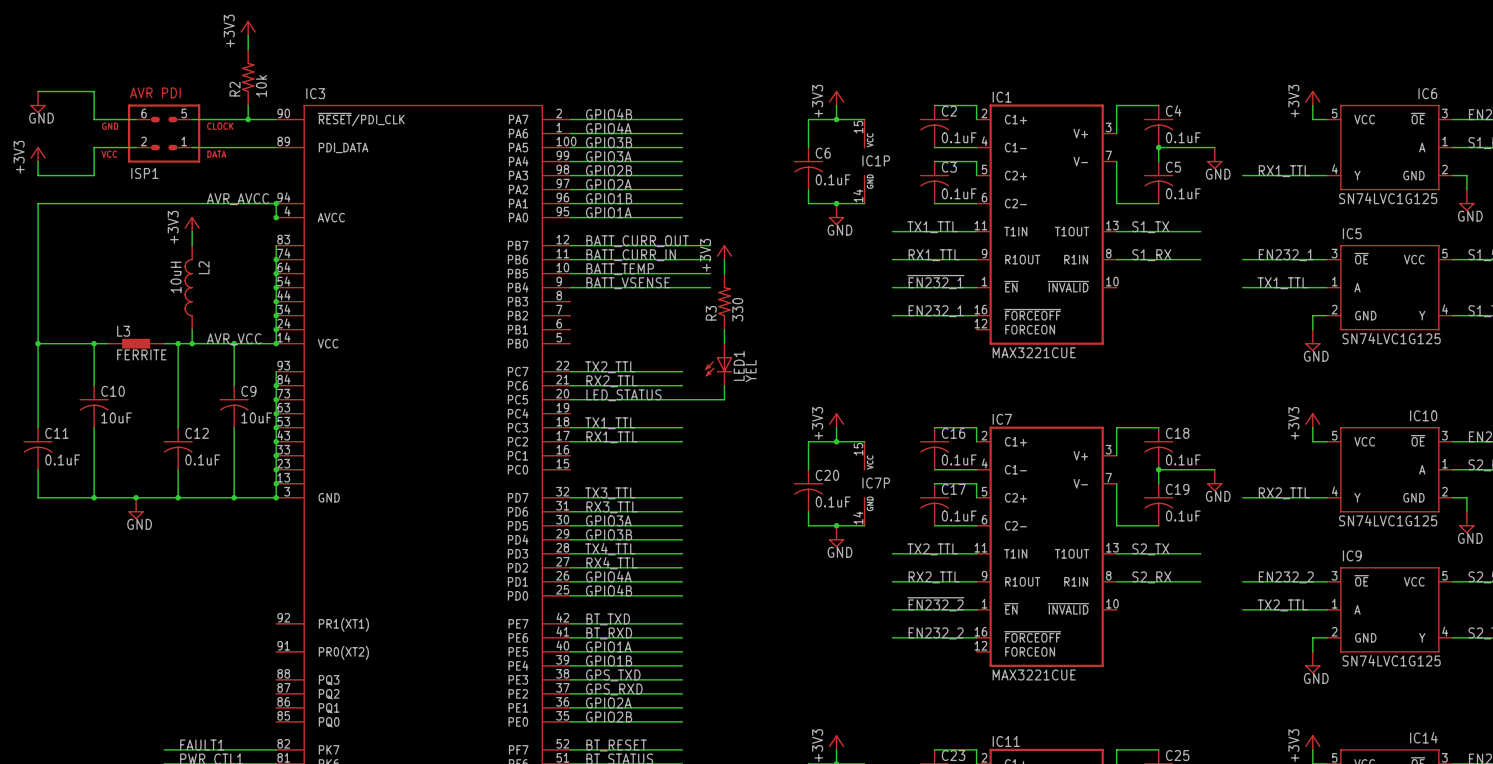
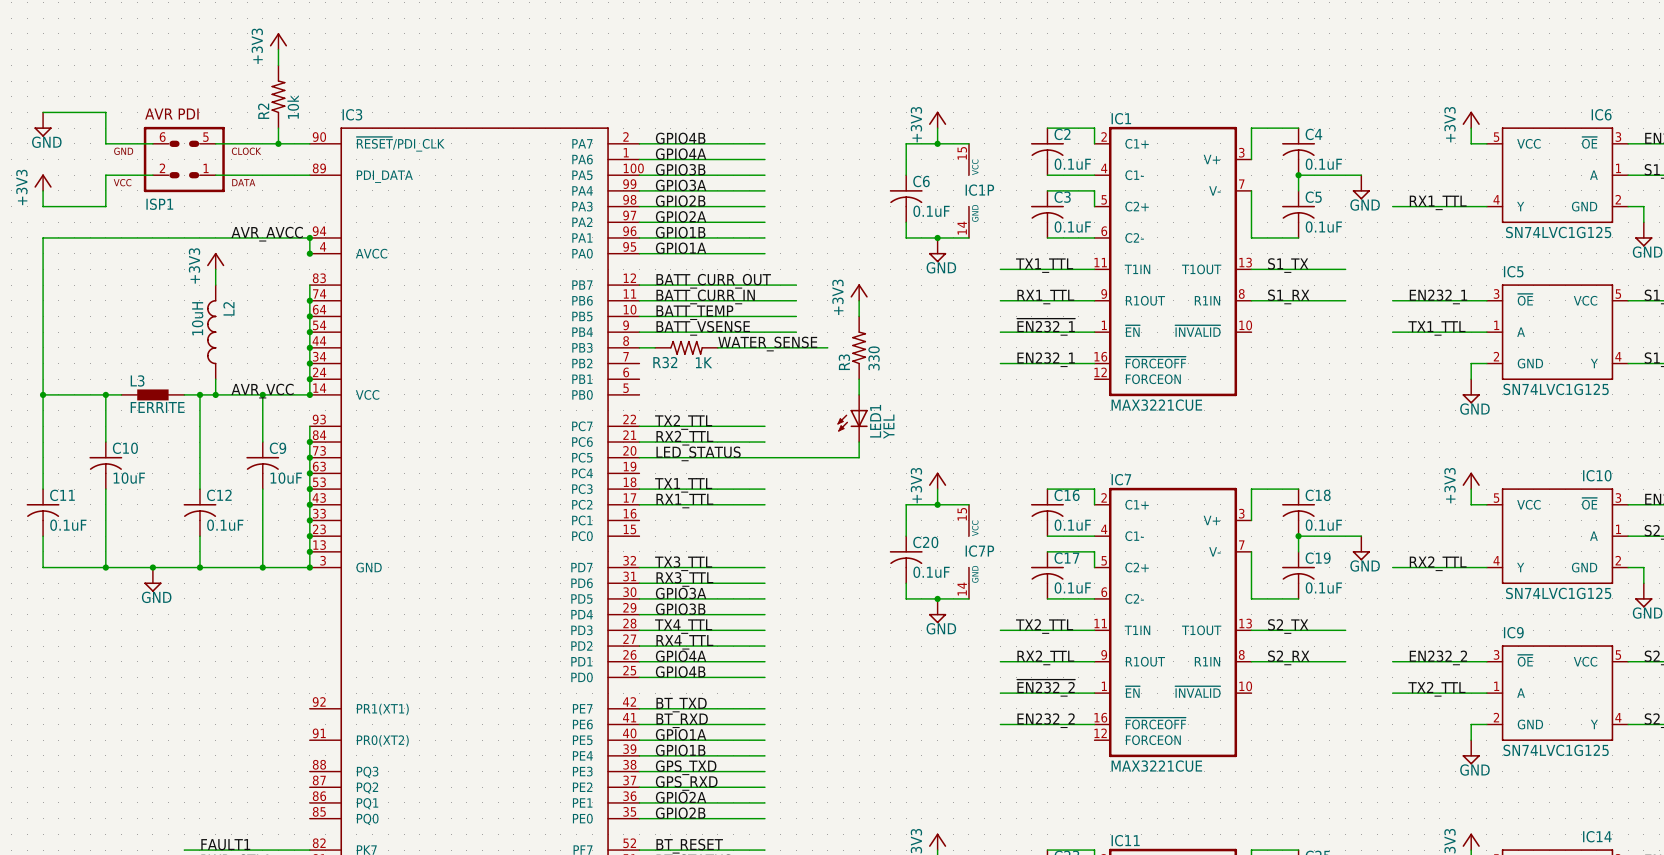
power symbol position: +3V3 (724, 252) -> +3V3 (859, 292)
wire: (724, 259) (724, 273) -> (859, 300) (859, 316)
label: none -> WATER_SENSE (767, 344)
wire: none -> (639, 347) (655, 347)
R32: none -> 1K (686, 347)
wire: none -> (717, 347) (827, 347)
R3 position: (724, 301) -> (859, 347)
wire: (724, 329) (724, 343) -> (859, 379) (859, 394)
LED1 position: (718, 364) -> (852, 418)
wire: (724, 385) (724, 399) -> (859, 442) (859, 457) (812, 457)

